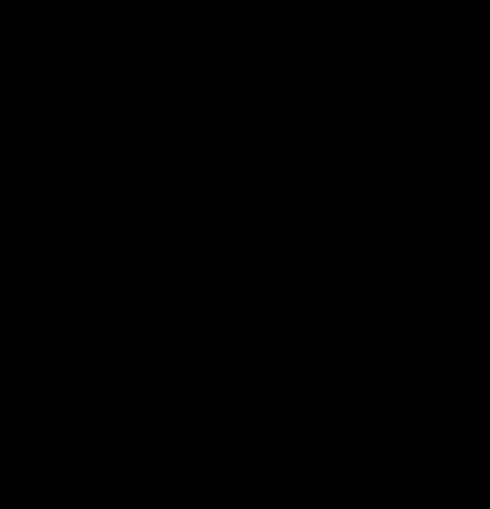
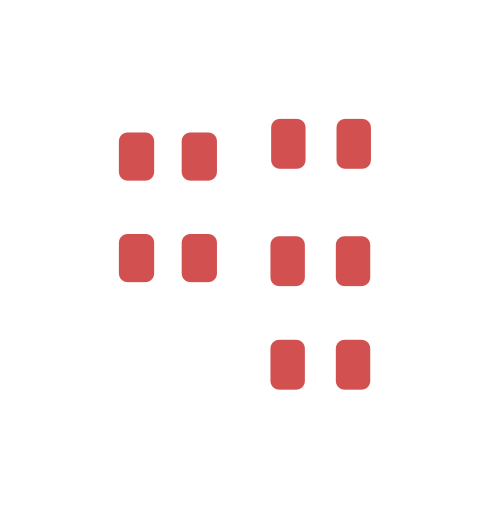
part: none -> (321, 143)
part: none -> (167, 156)
part: none -> (167, 258)
part: none -> (320, 261)
part: none -> (320, 364)

